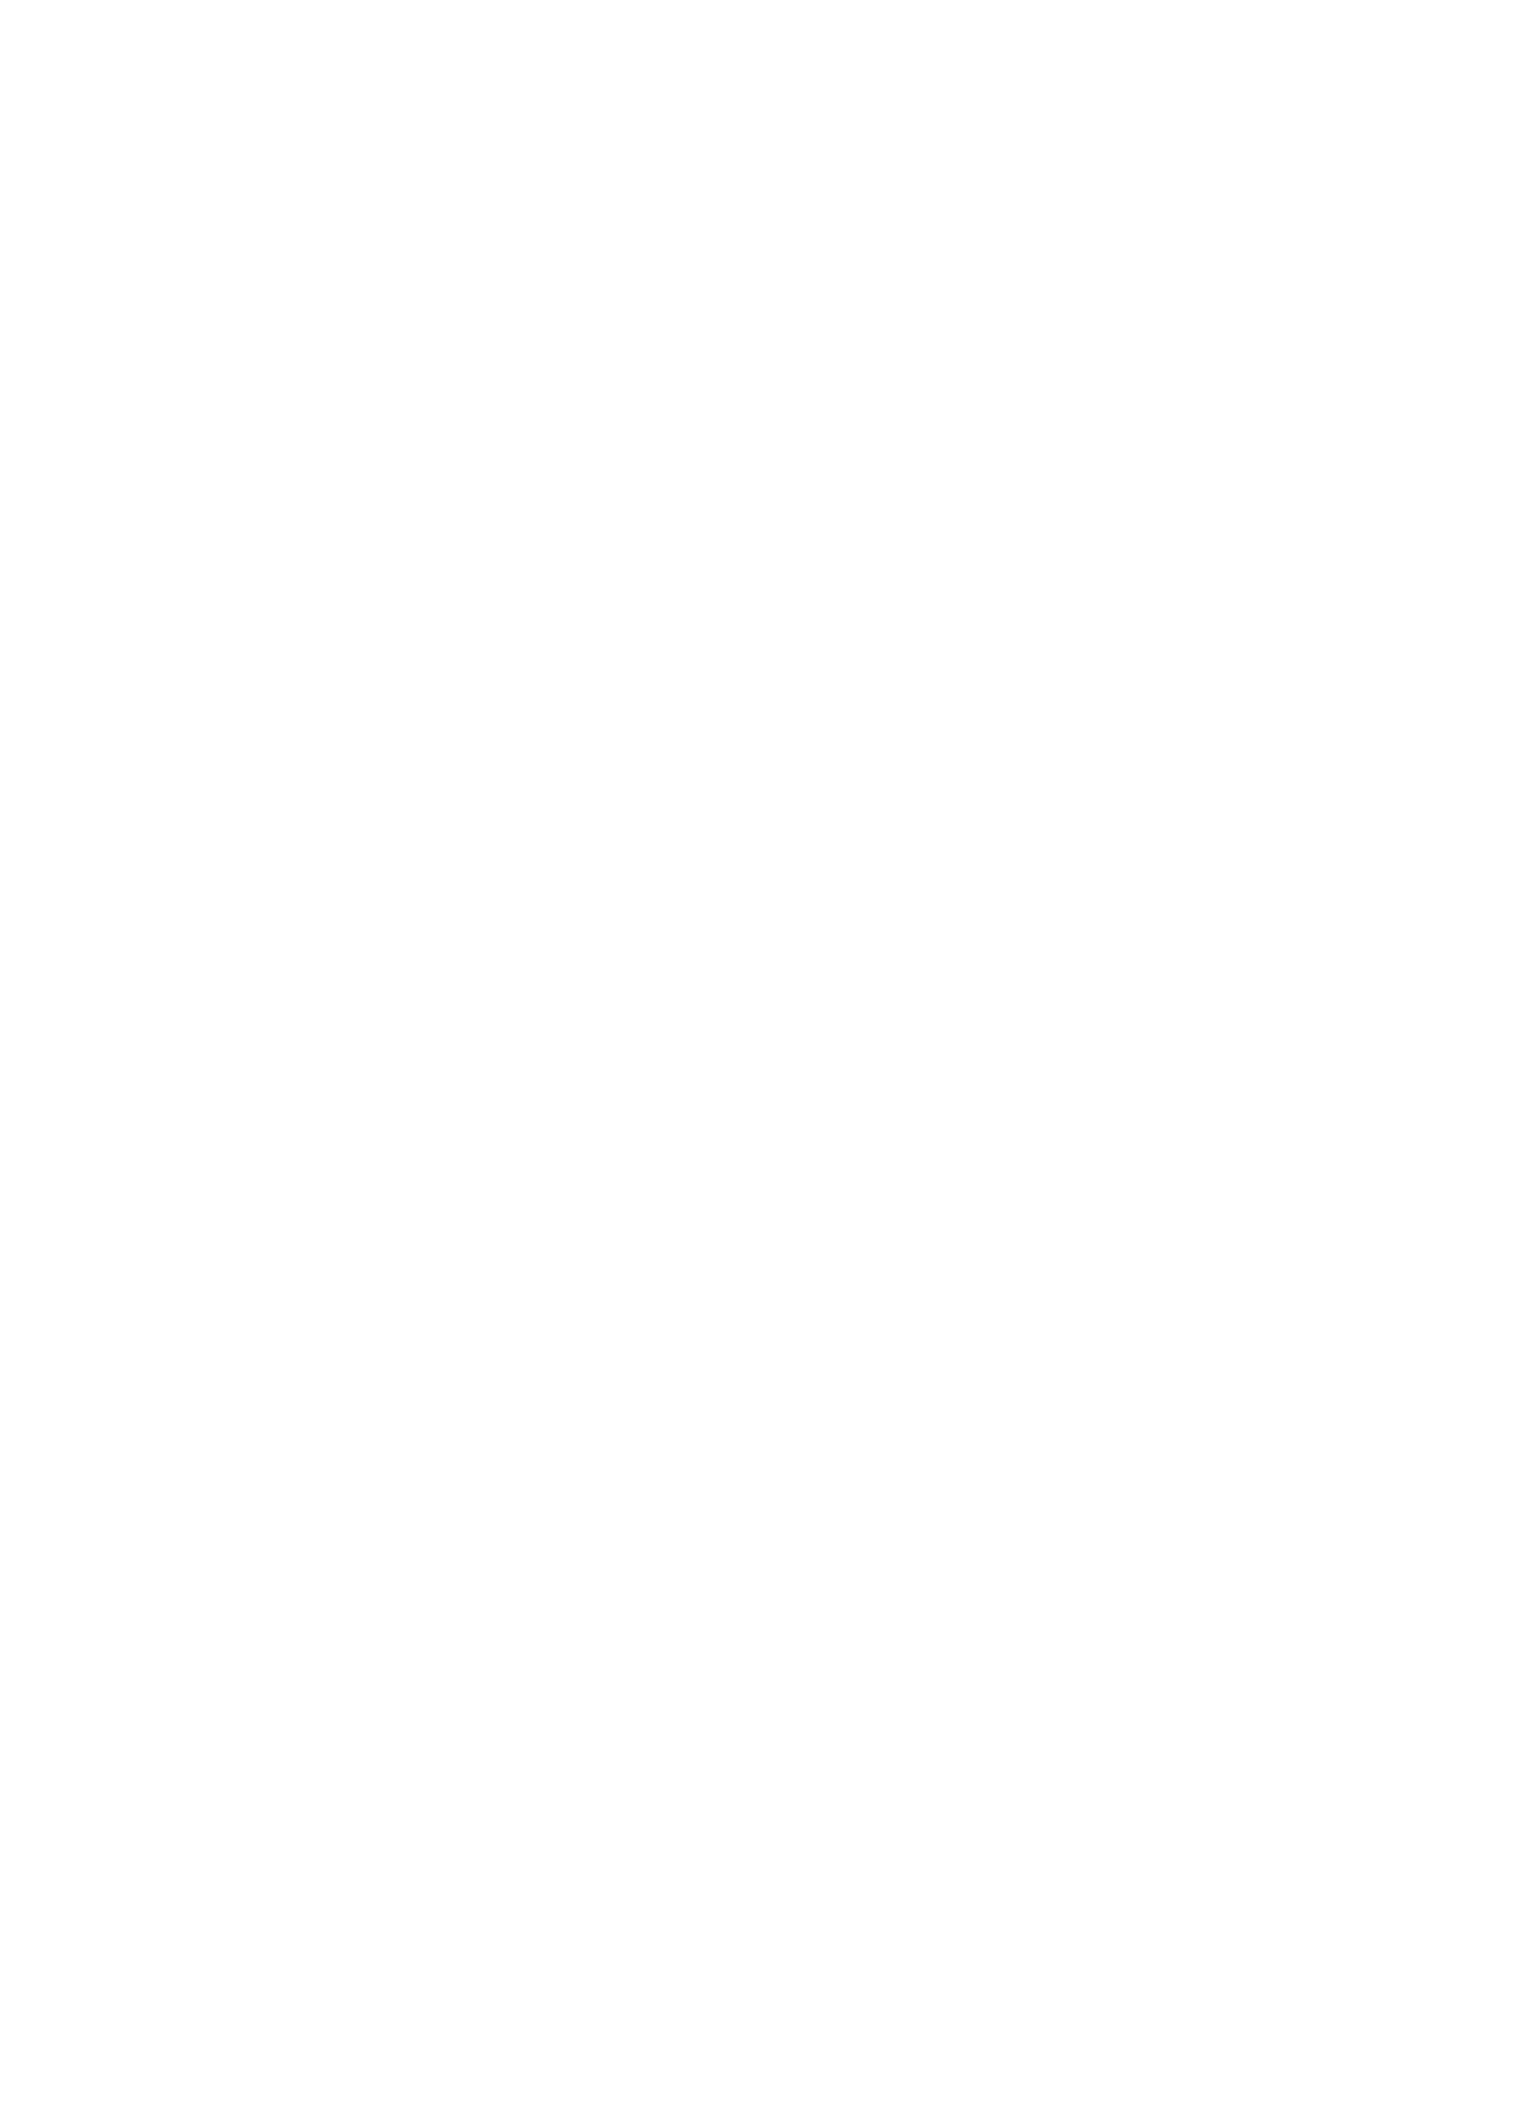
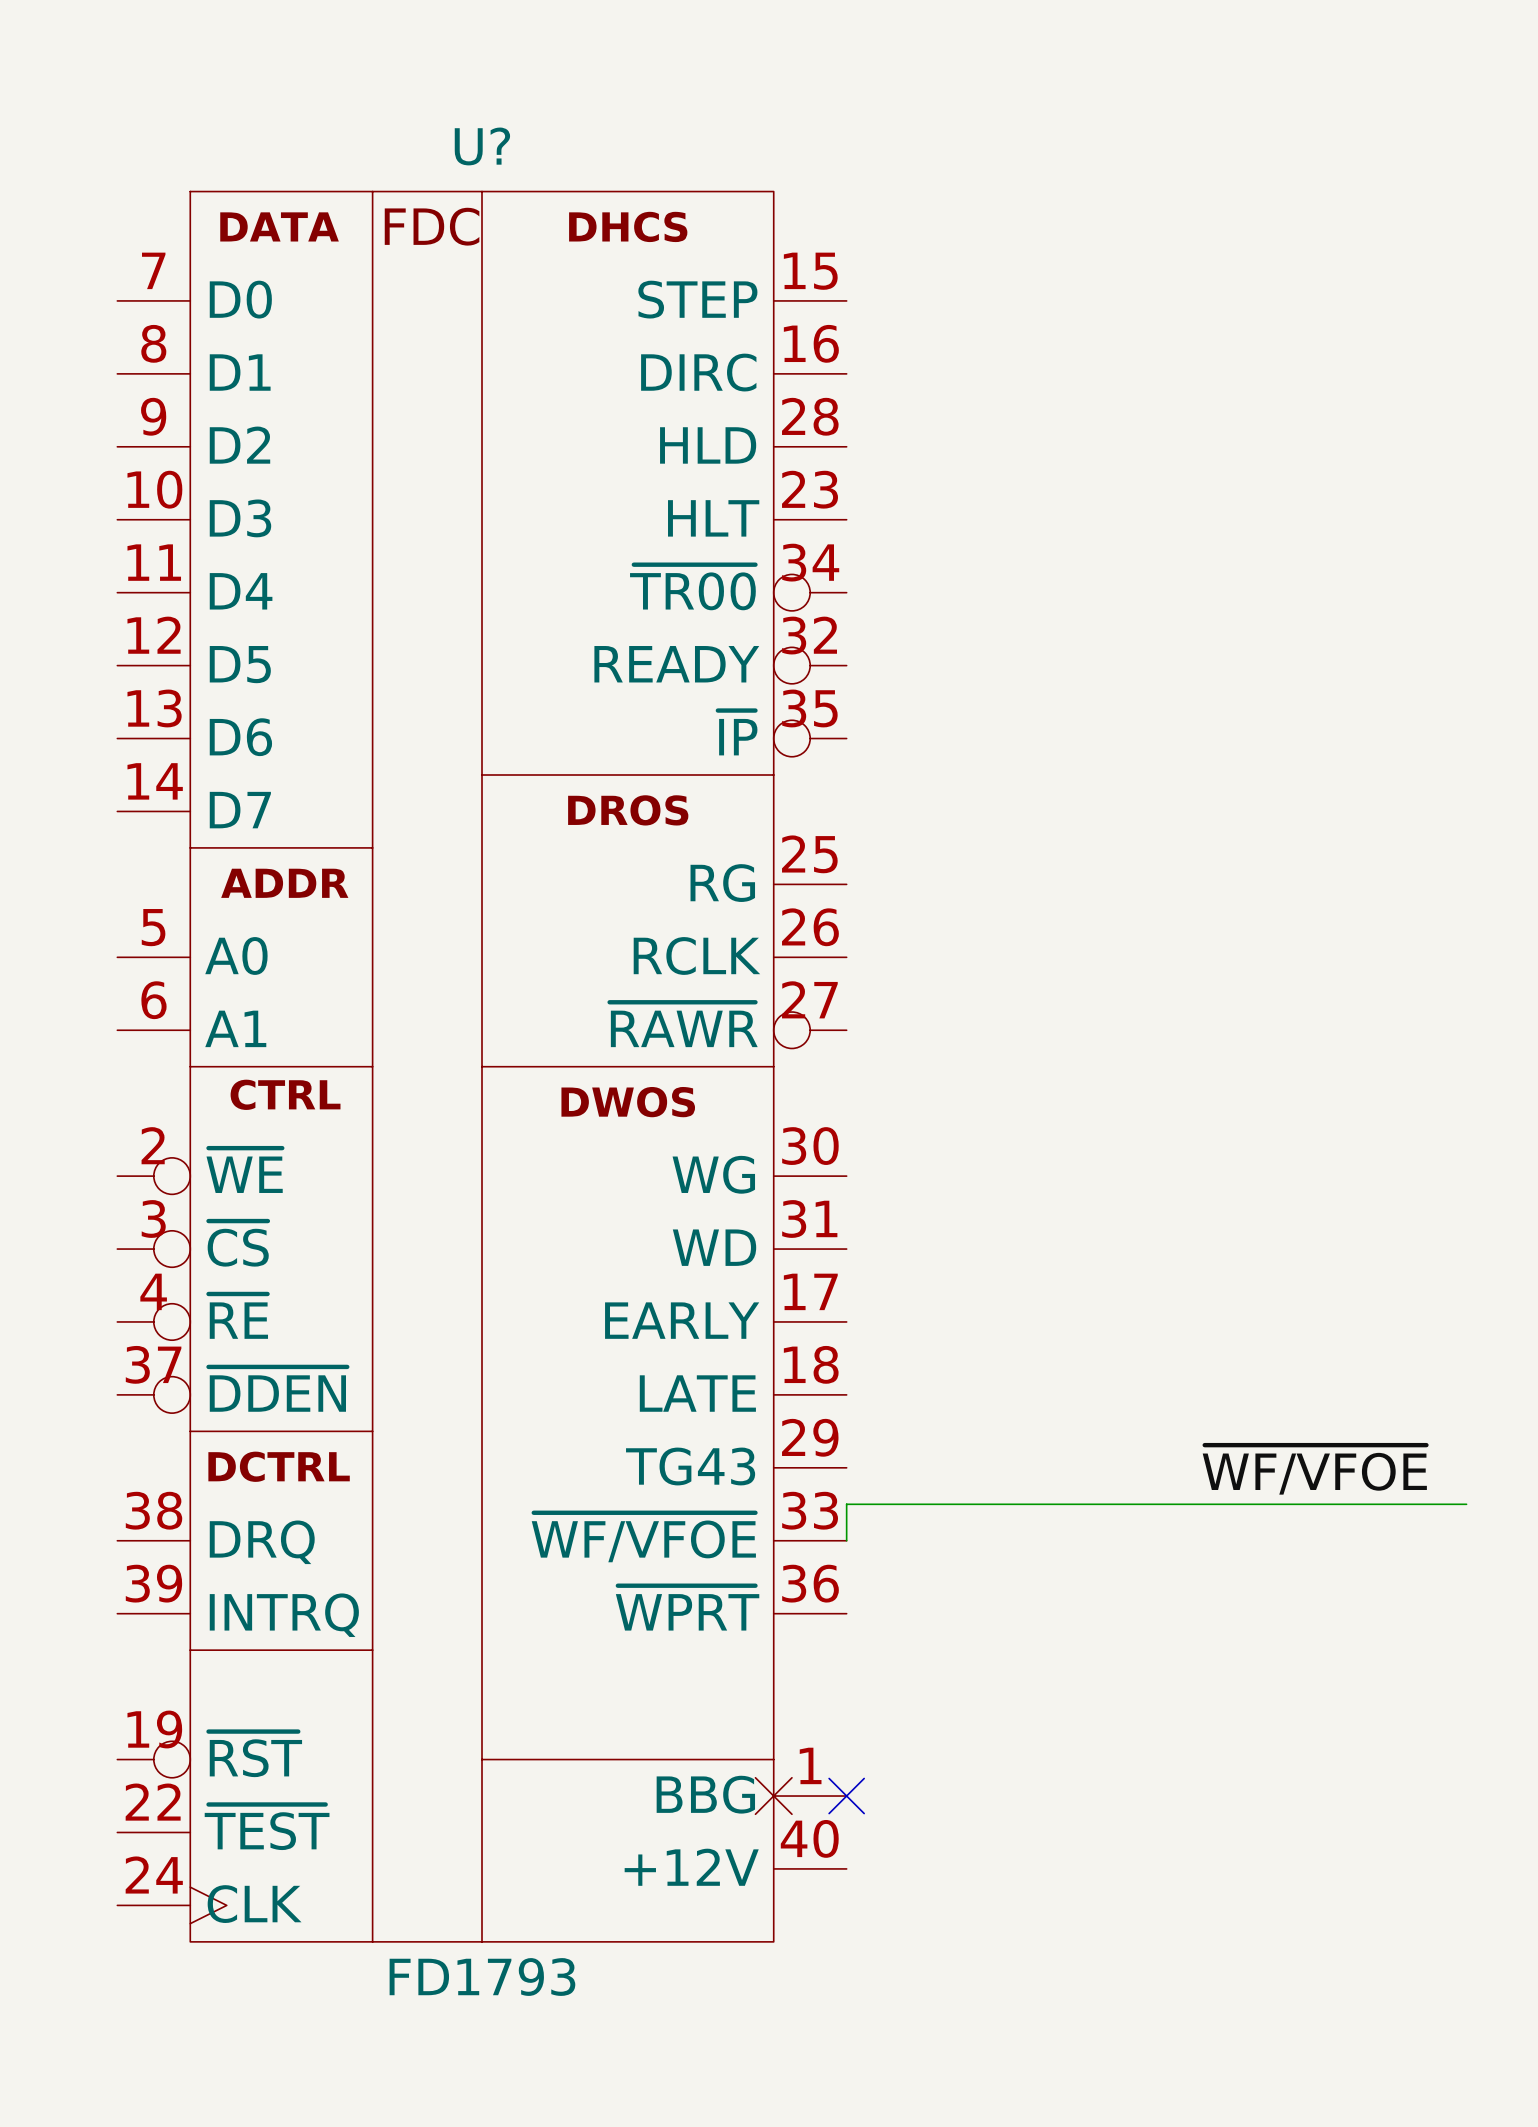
U?: none -> FD1793 (482, 1066)
label: none -> ~{WF/VFOE} (1314, 1469)
wire: none -> (1466, 1504) (846, 1504) (846, 1540)
no-connect mark: none -> (846, 1796)

